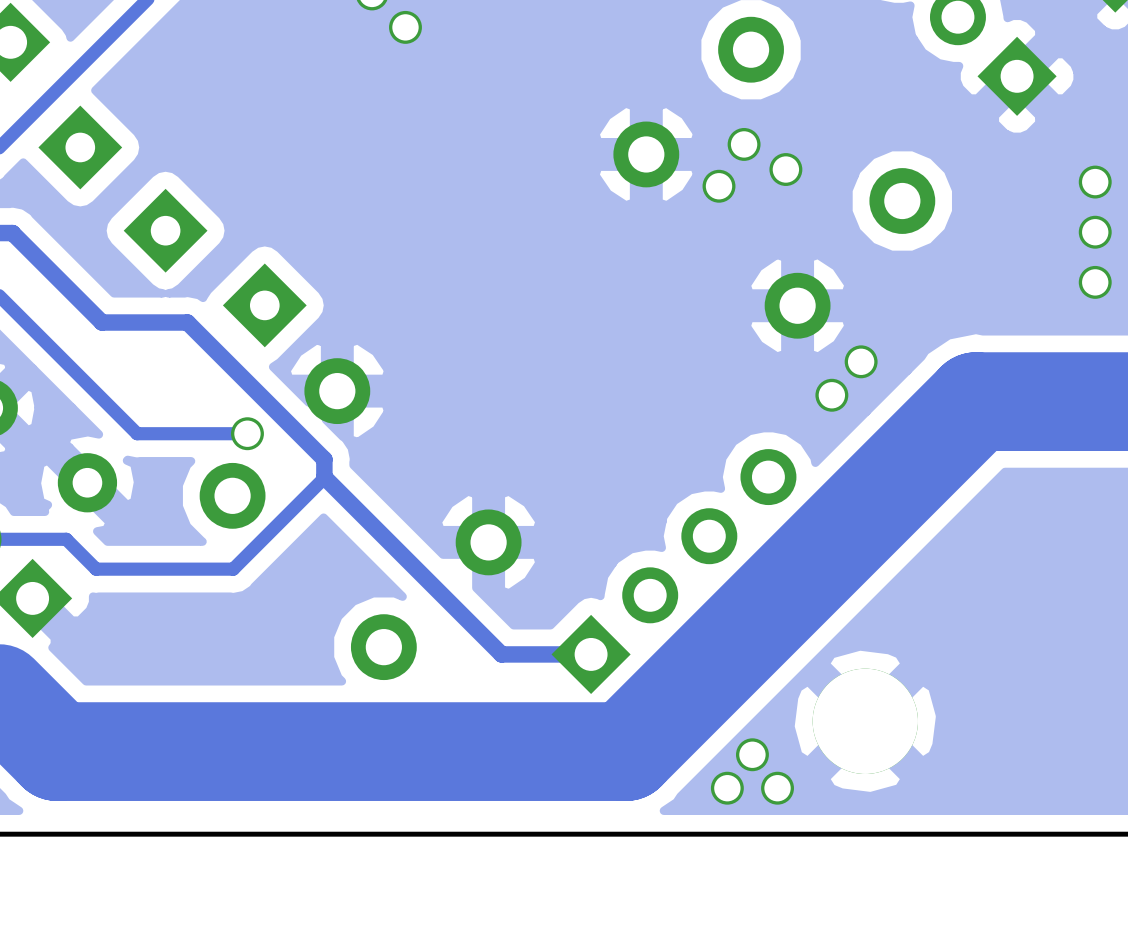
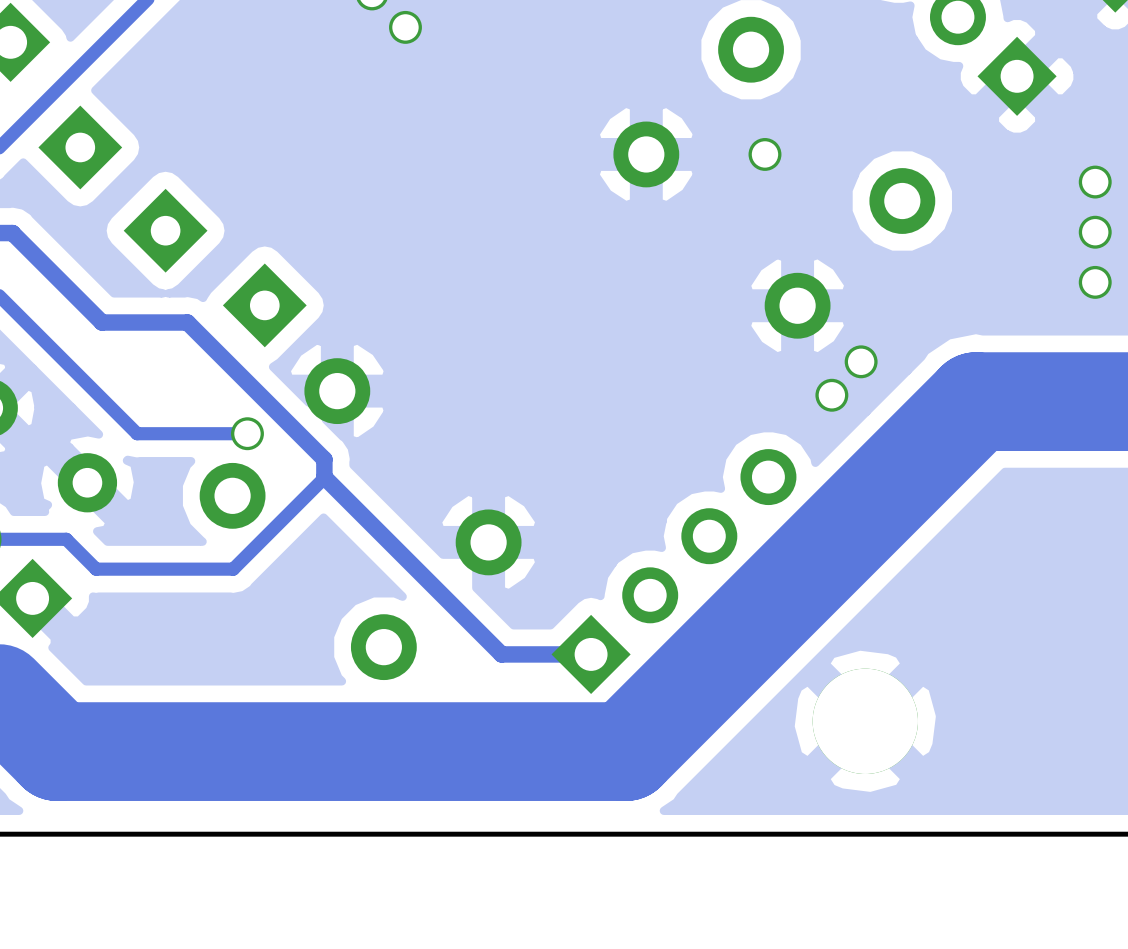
via: (744, 144) -> none
via: none -> (764, 154)
via: (785, 169) -> none
via: (719, 186) -> none
via: (752, 754) -> none
via: (727, 788) -> none
via: (777, 788) -> none

